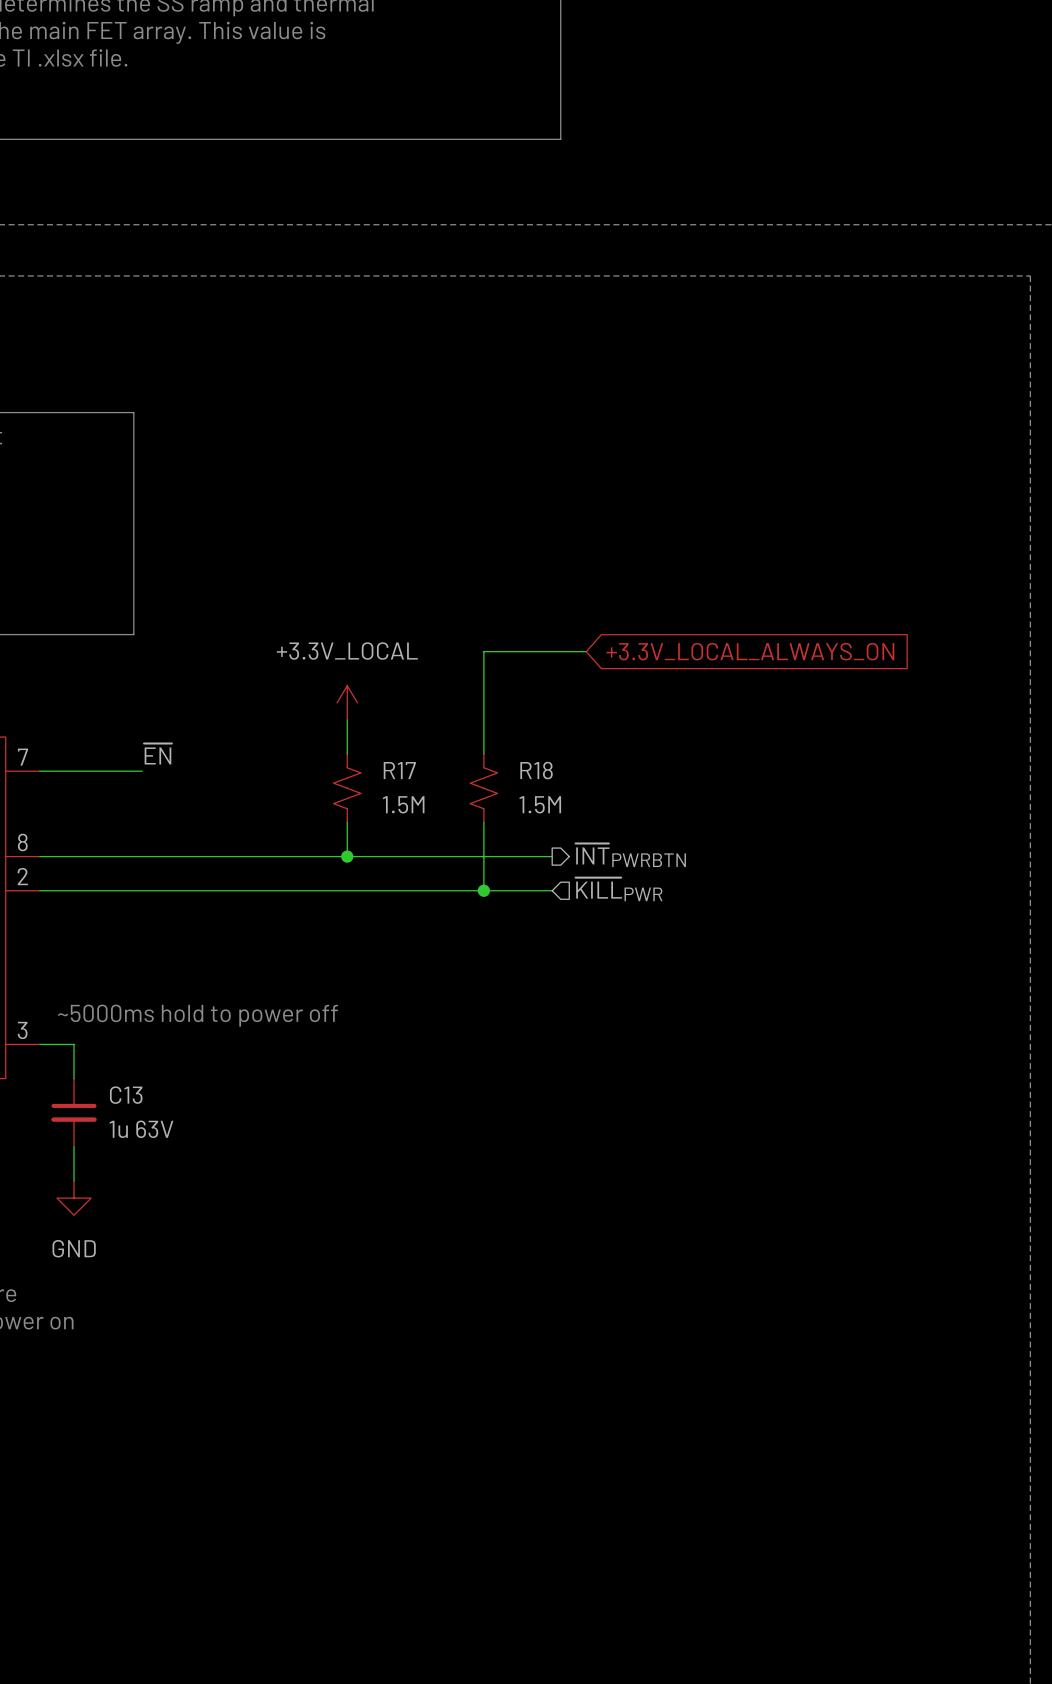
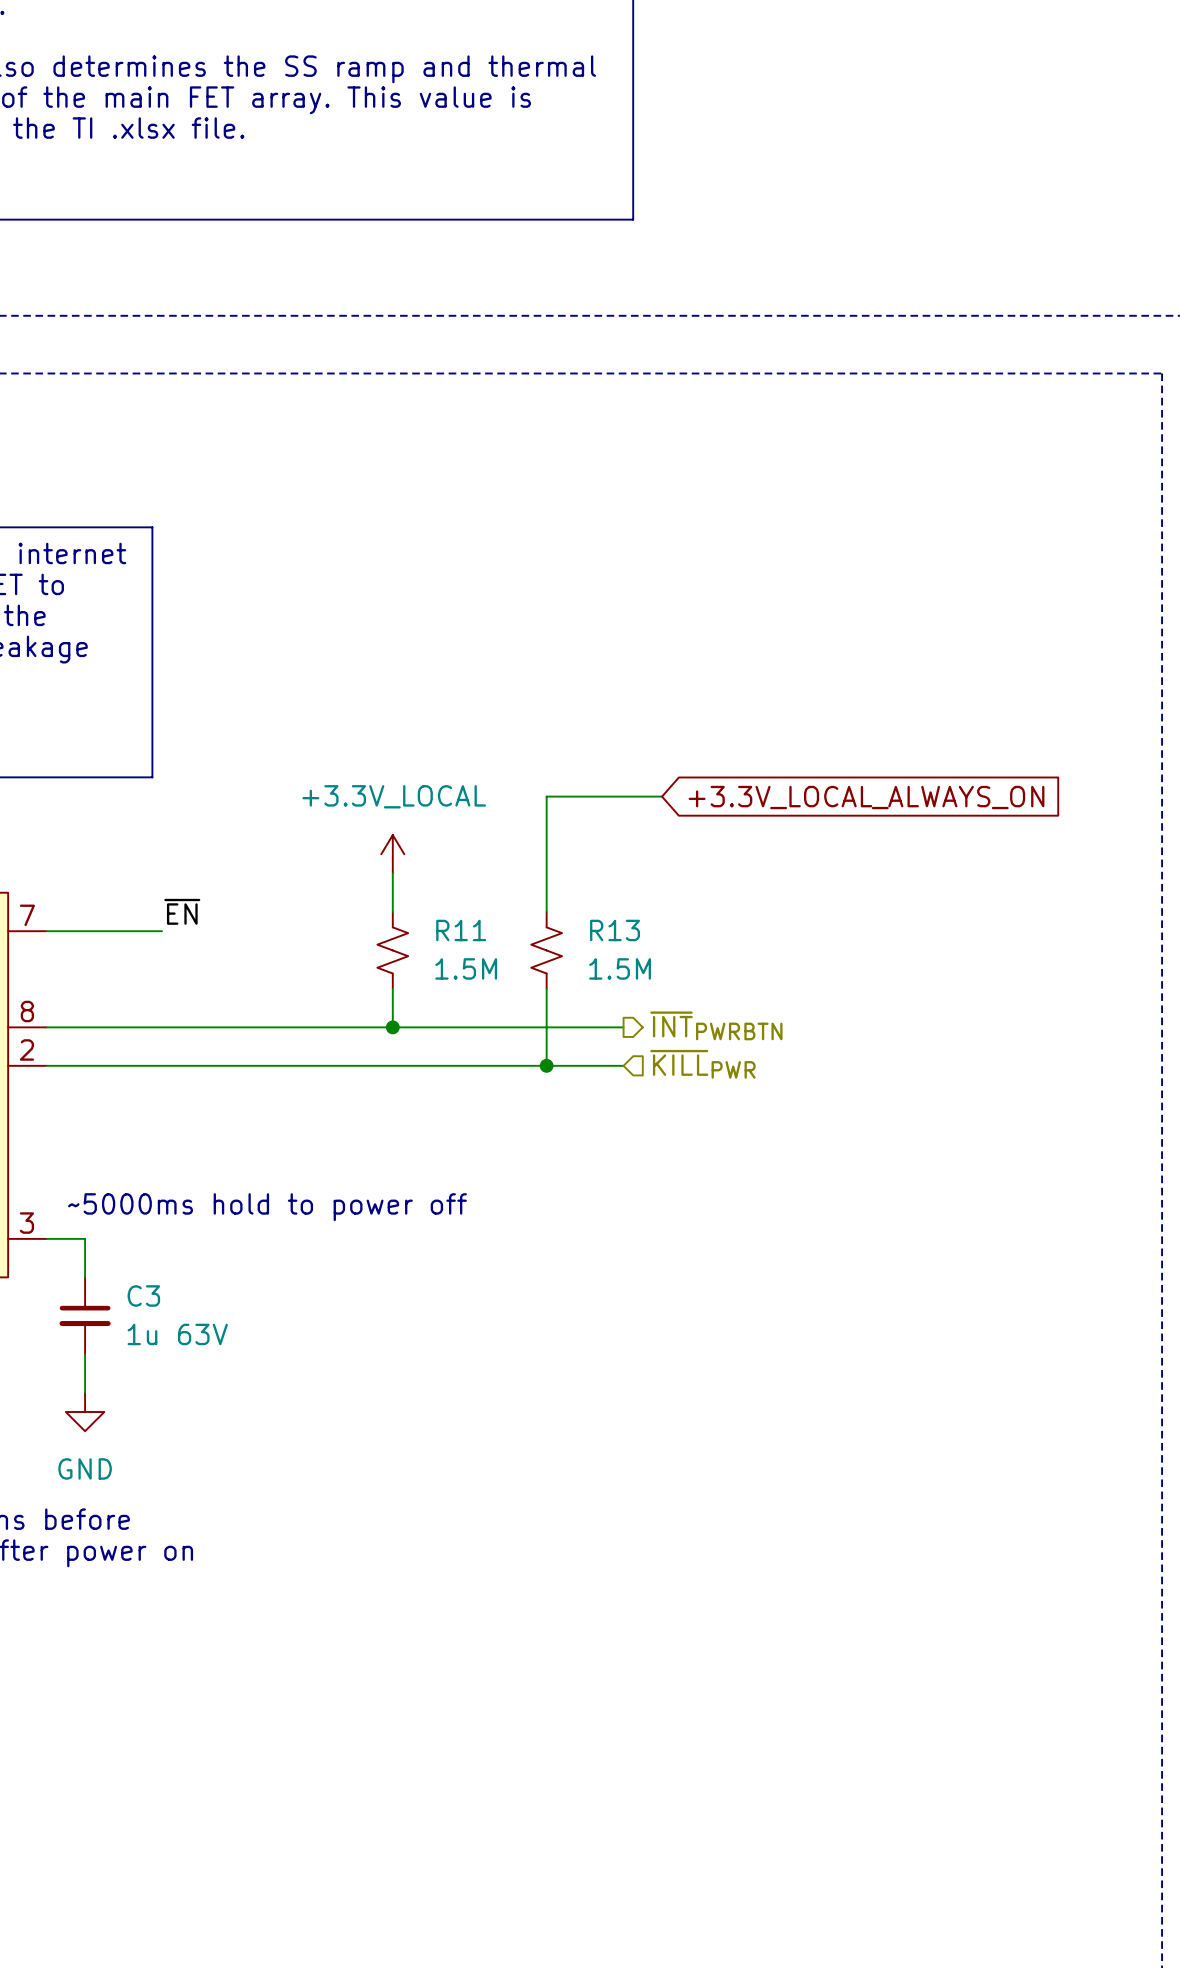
R17 name: R17 (399, 770) -> R11 (461, 930)
R18 name: R18 (536, 770) -> R13 (615, 930)
C13 name: C13 (126, 1095) -> C3 (143, 1295)

